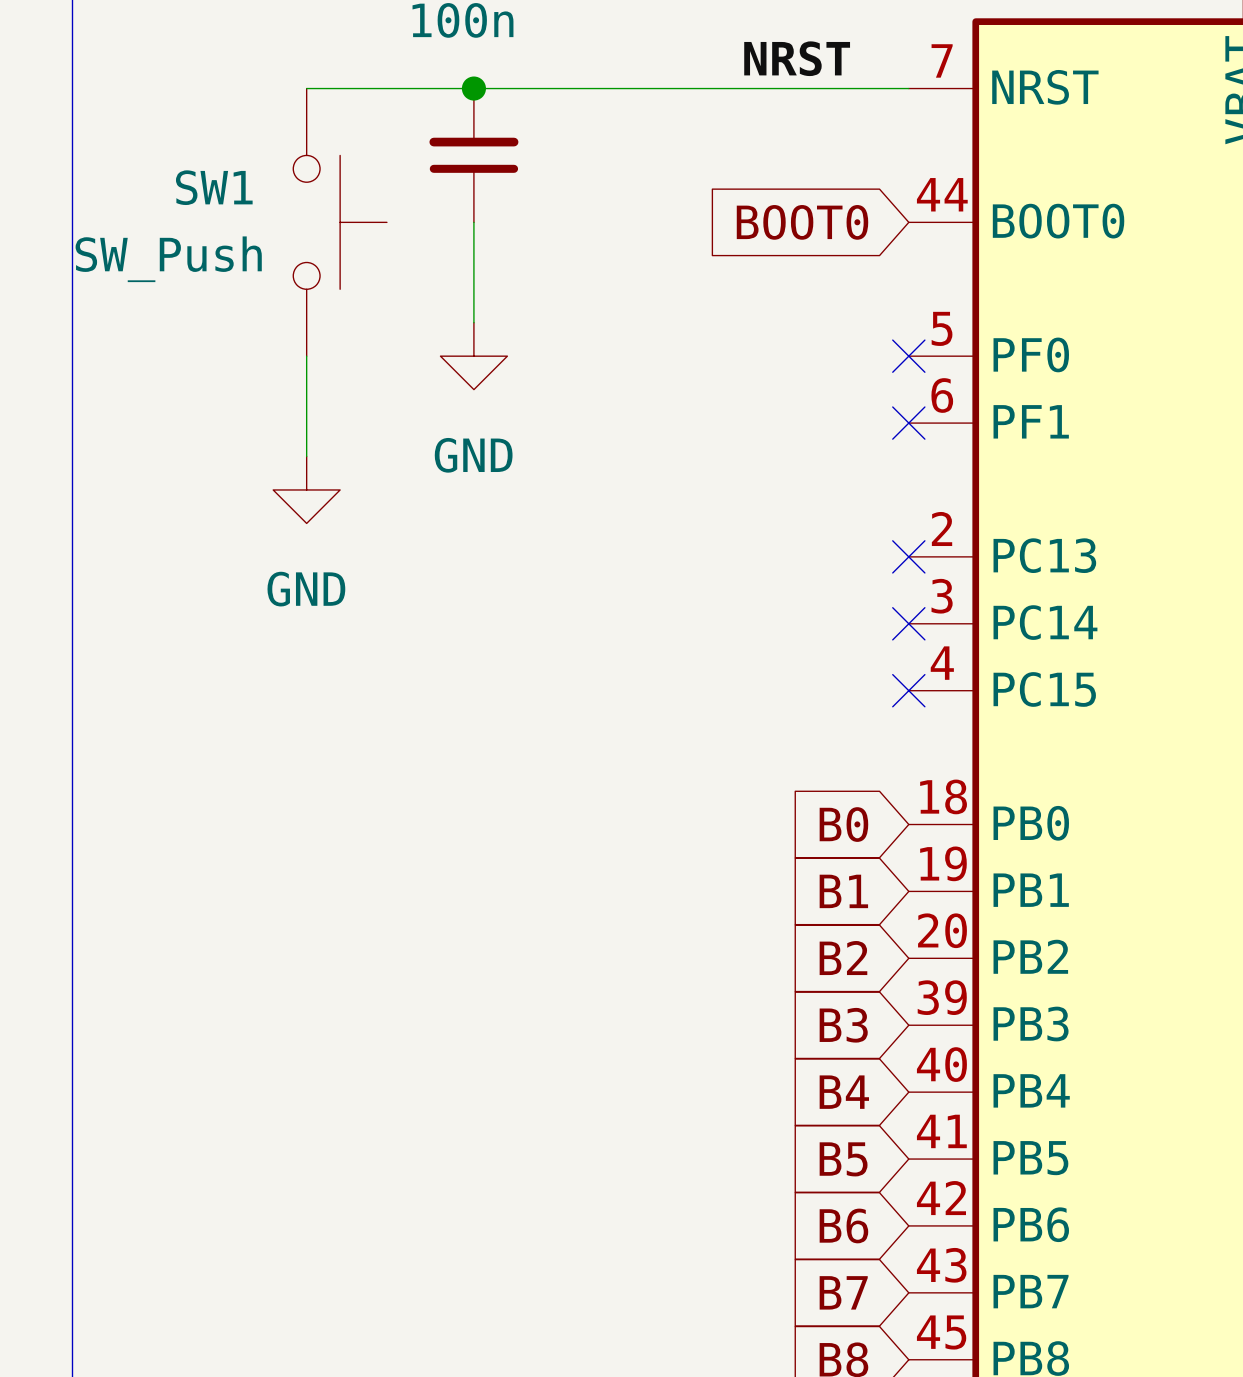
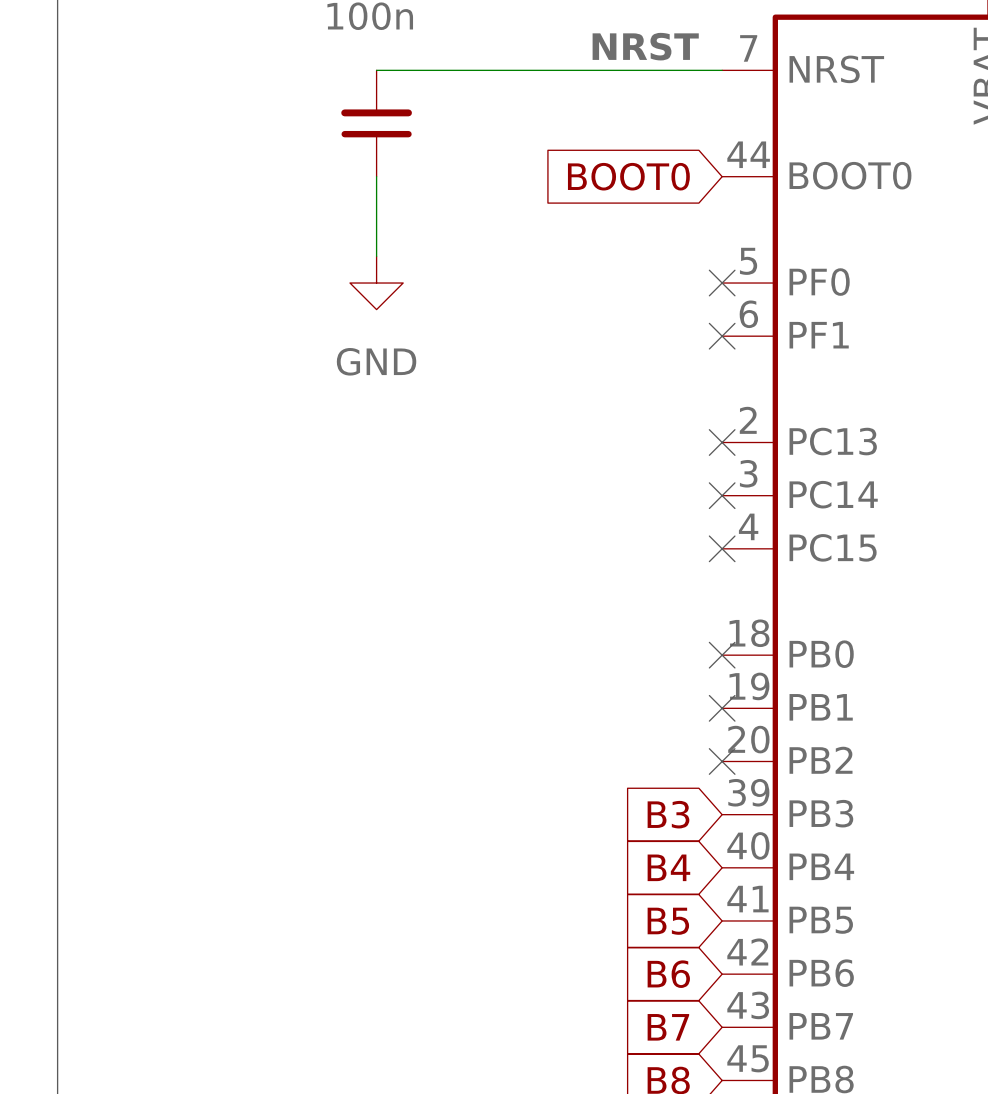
wire: (306, 88) (473, 88) -> none
junction: (473, 88) -> none
SW1: SW_Push (340, 222) -> none
wire: (306, 356) (306, 456) -> none
power symbol: GND (306, 489) -> none
global label: B0 (843, 824) -> none
no-connect mark: none -> (722, 655)
global label: B1 (843, 891) -> none
no-connect mark: none -> (722, 708)
global label: B2 (843, 958) -> none
no-connect mark: none -> (722, 761)

